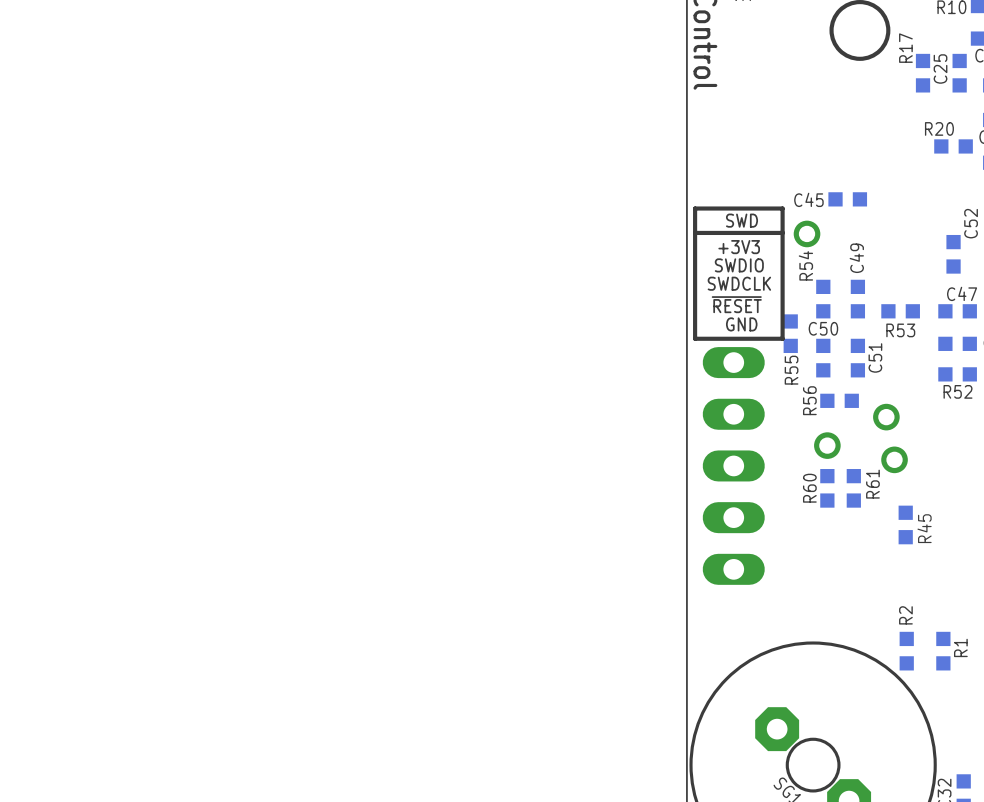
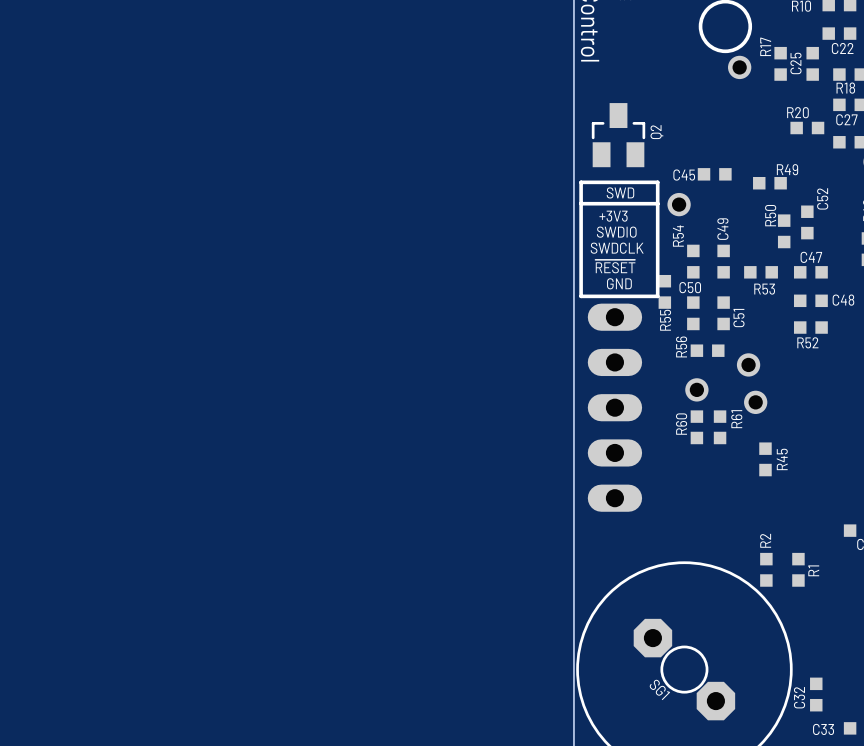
part: none -> (739, 67)
Q2: none -> (618, 135)
R49: none -> (769, 183)
R50: none -> (784, 231)

